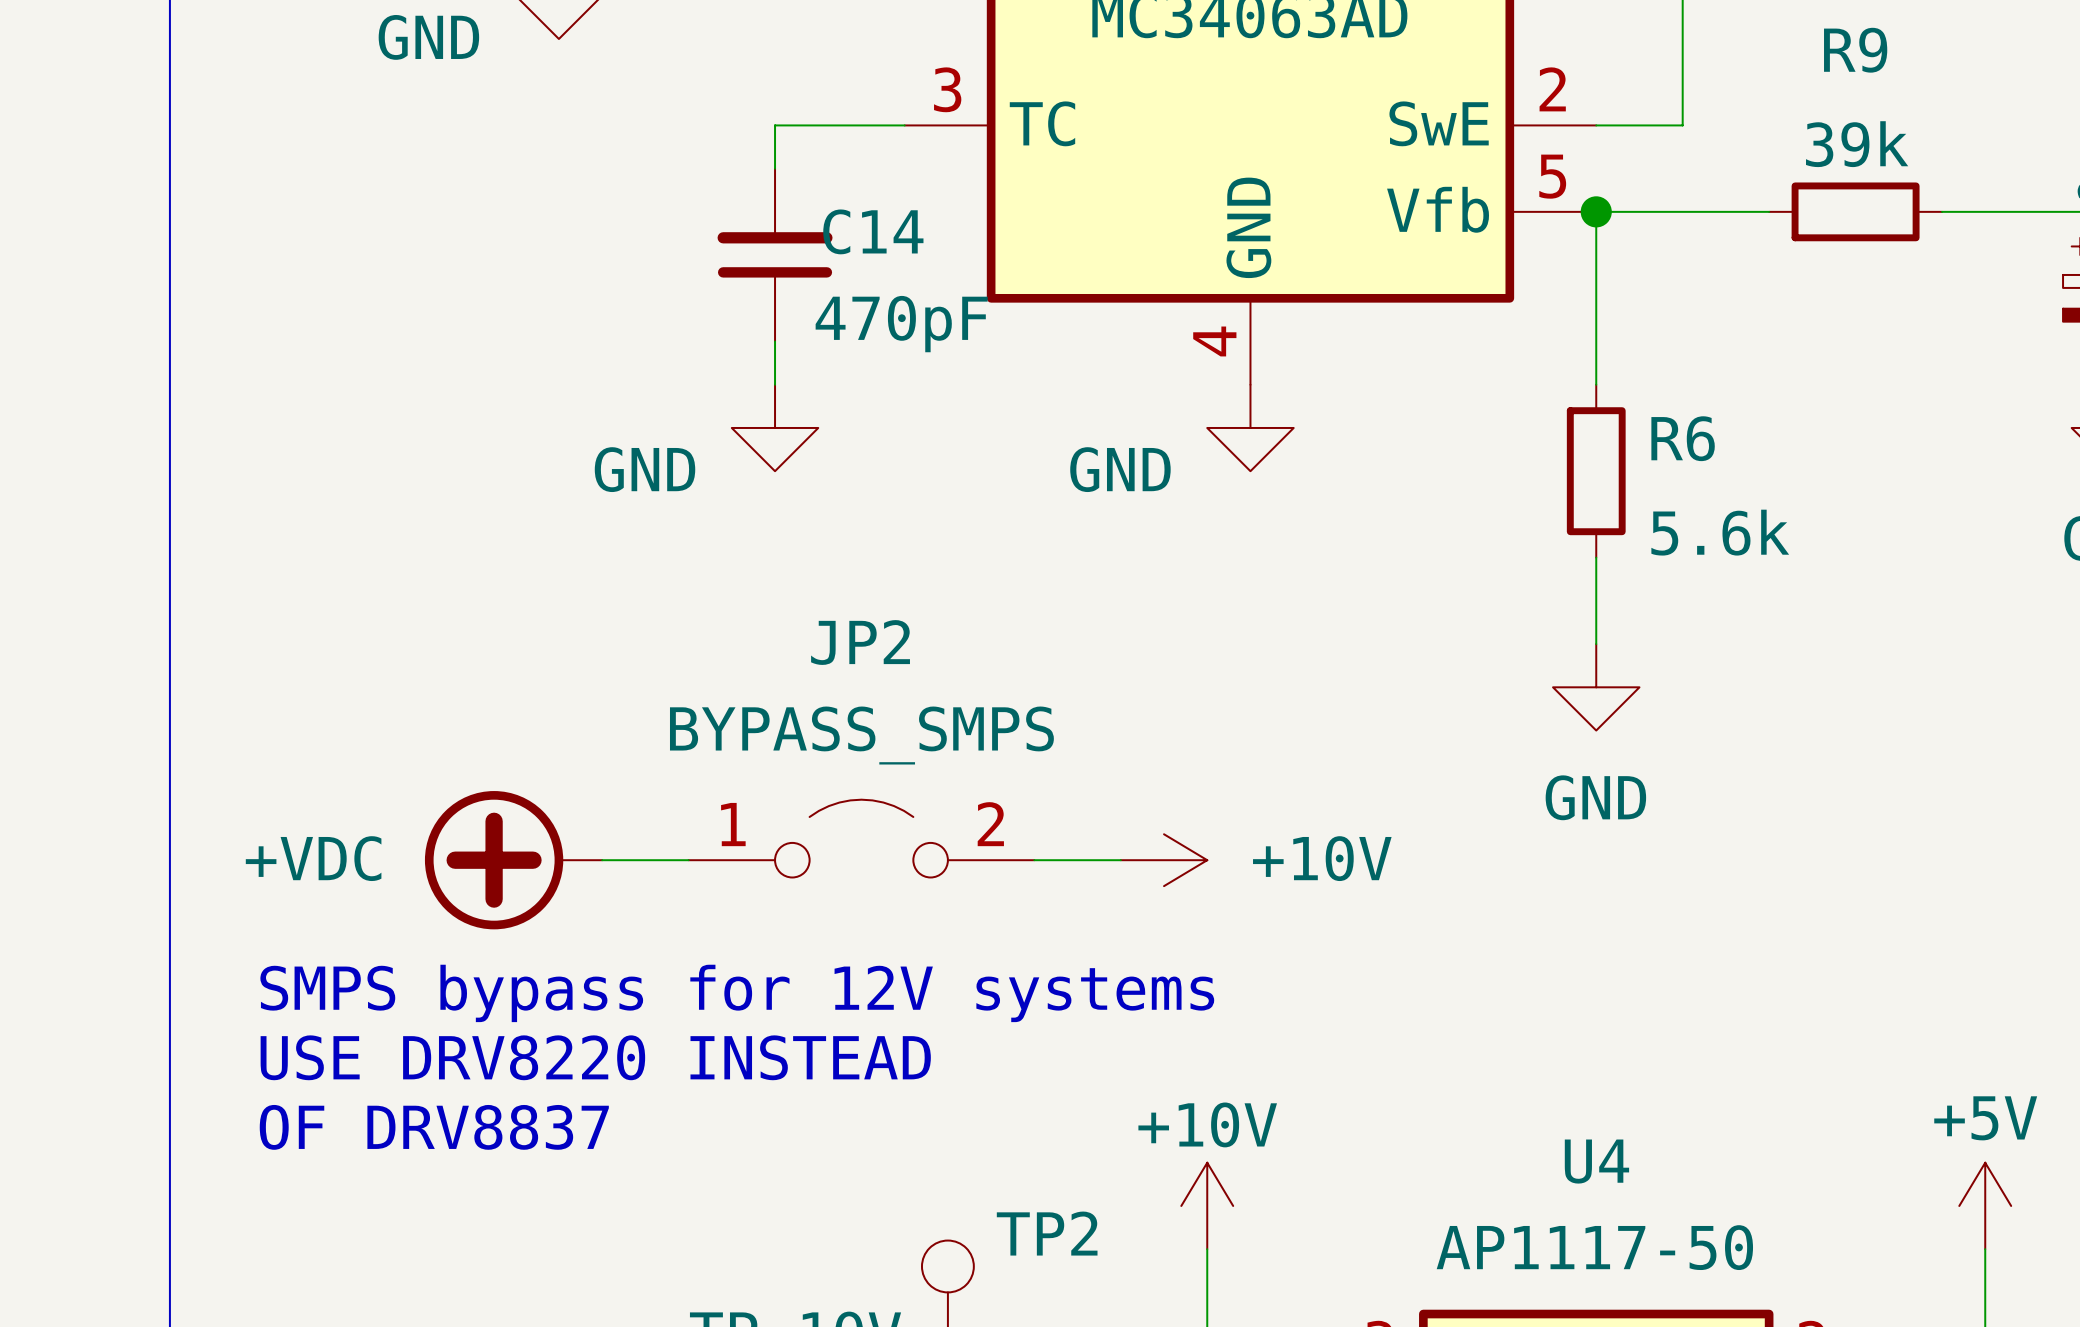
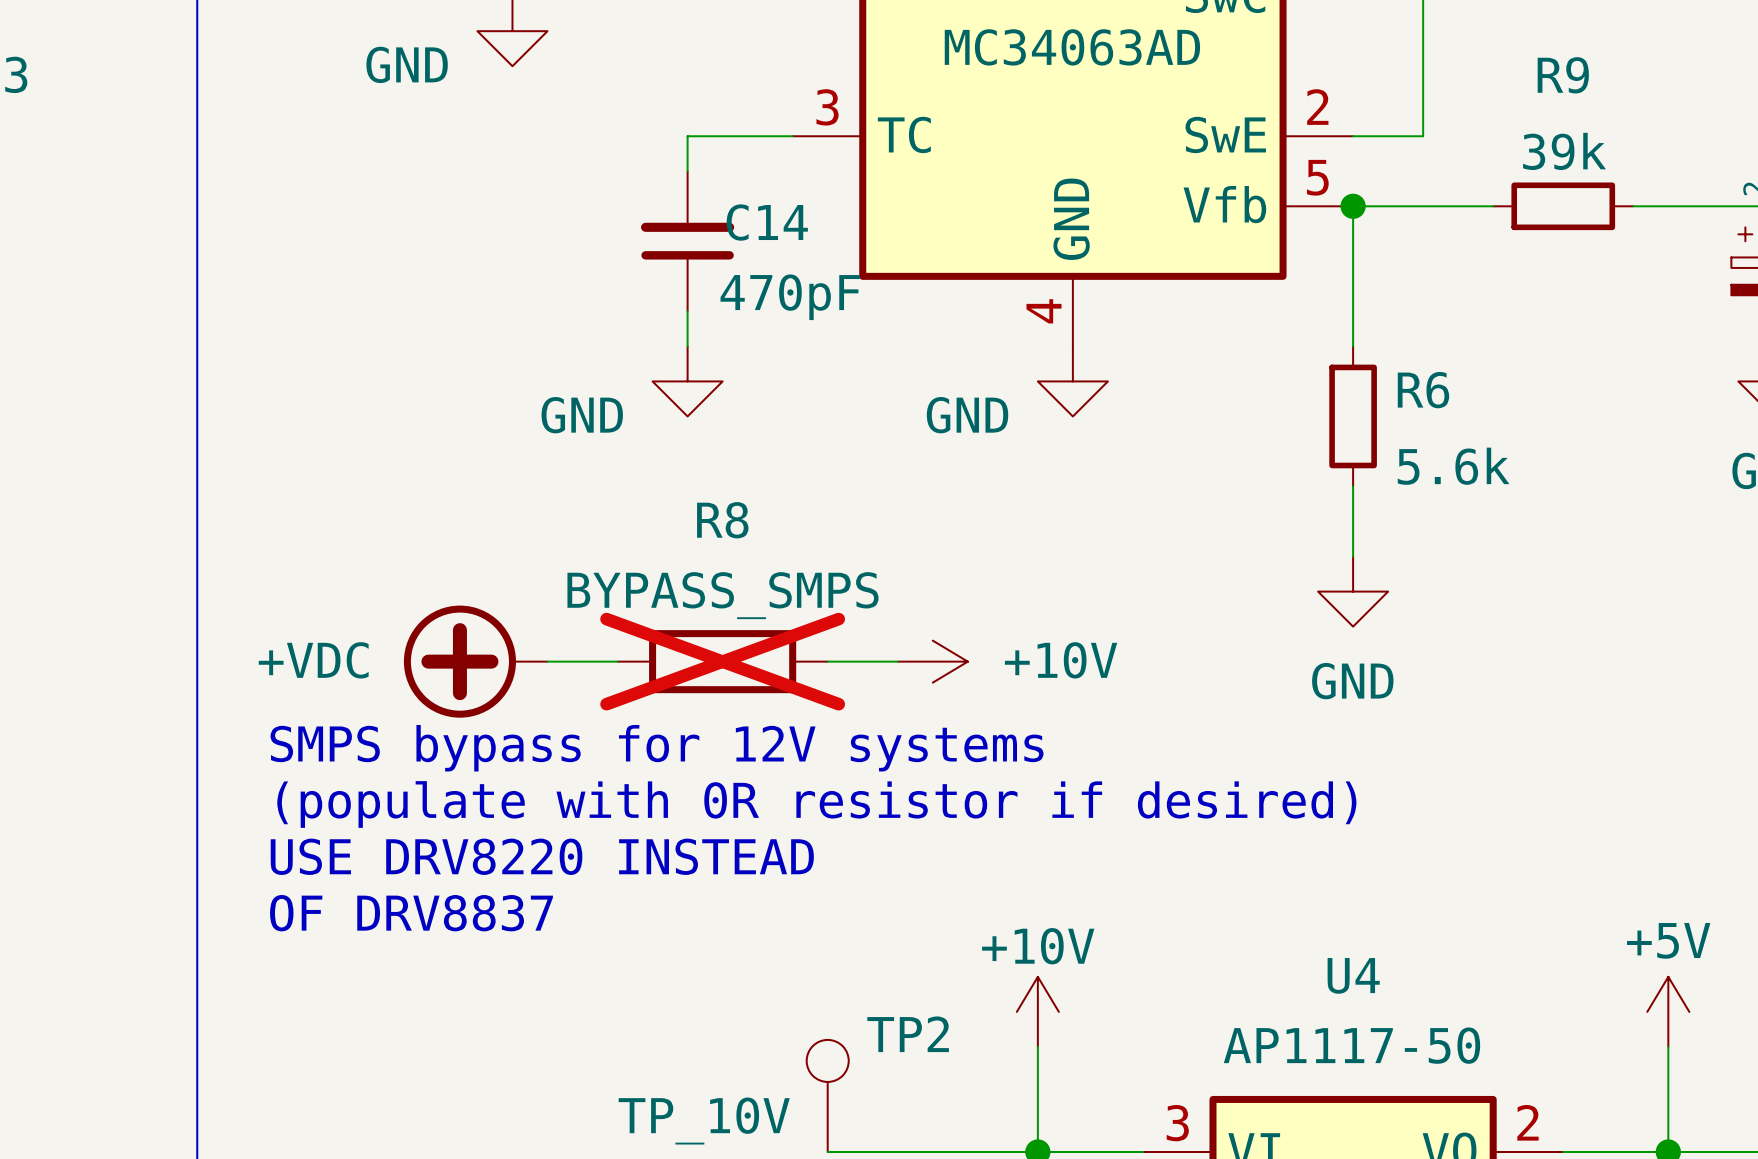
R8: none -> BYPASS_SMPS (722, 661)
JP2: BYPASS_SMPS (861, 838) -> none
power symbol position: +VDC (513, 860) -> +VDC (475, 661)
wire: (602, 860) (688, 860) -> (547, 661) (617, 661)
wire: (1034, 860) (1120, 860) -> (827, 661) (897, 661)
power symbol position: +10V (1164, 860) -> +10V (932, 661)
text: none -> (populate with 0R resistor if desired) (816, 804)
text position: SMPS bypass for 12V systems (737, 993) -> SMPS bypass for 12V systems (657, 748)
text position: USE DRV8220 INSTEAD (595, 1057) -> USE DRV8220 INSTEAD (542, 856)
text position: OF DRV8837 (434, 1127) -> OF DRV8837 (411, 913)

